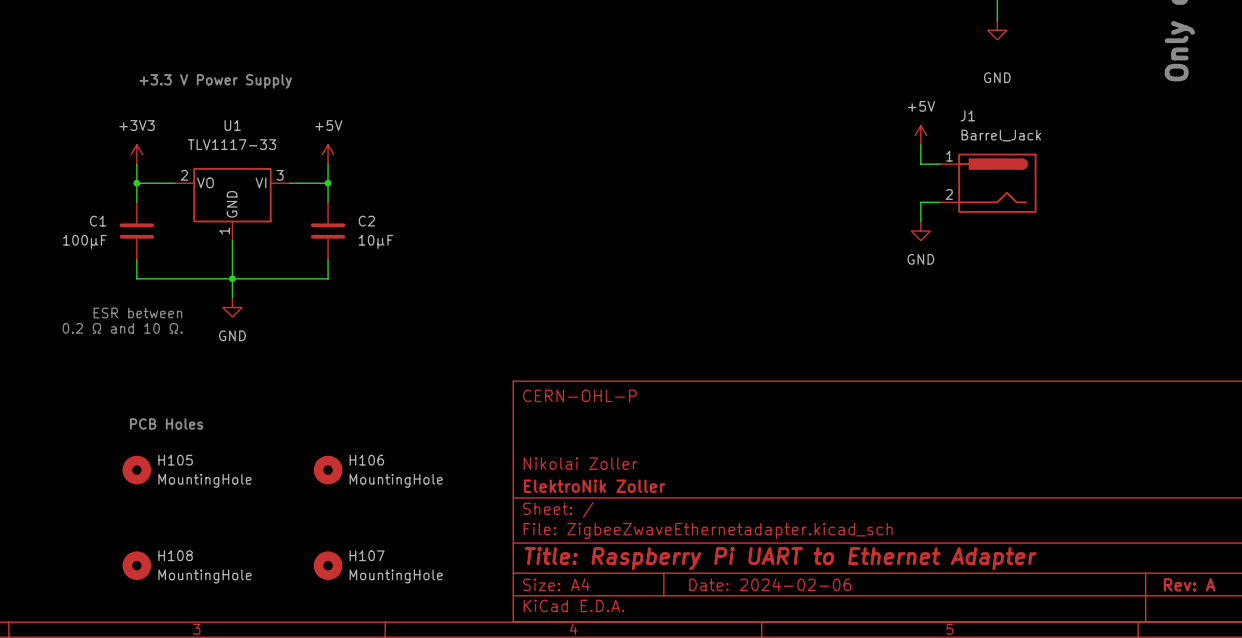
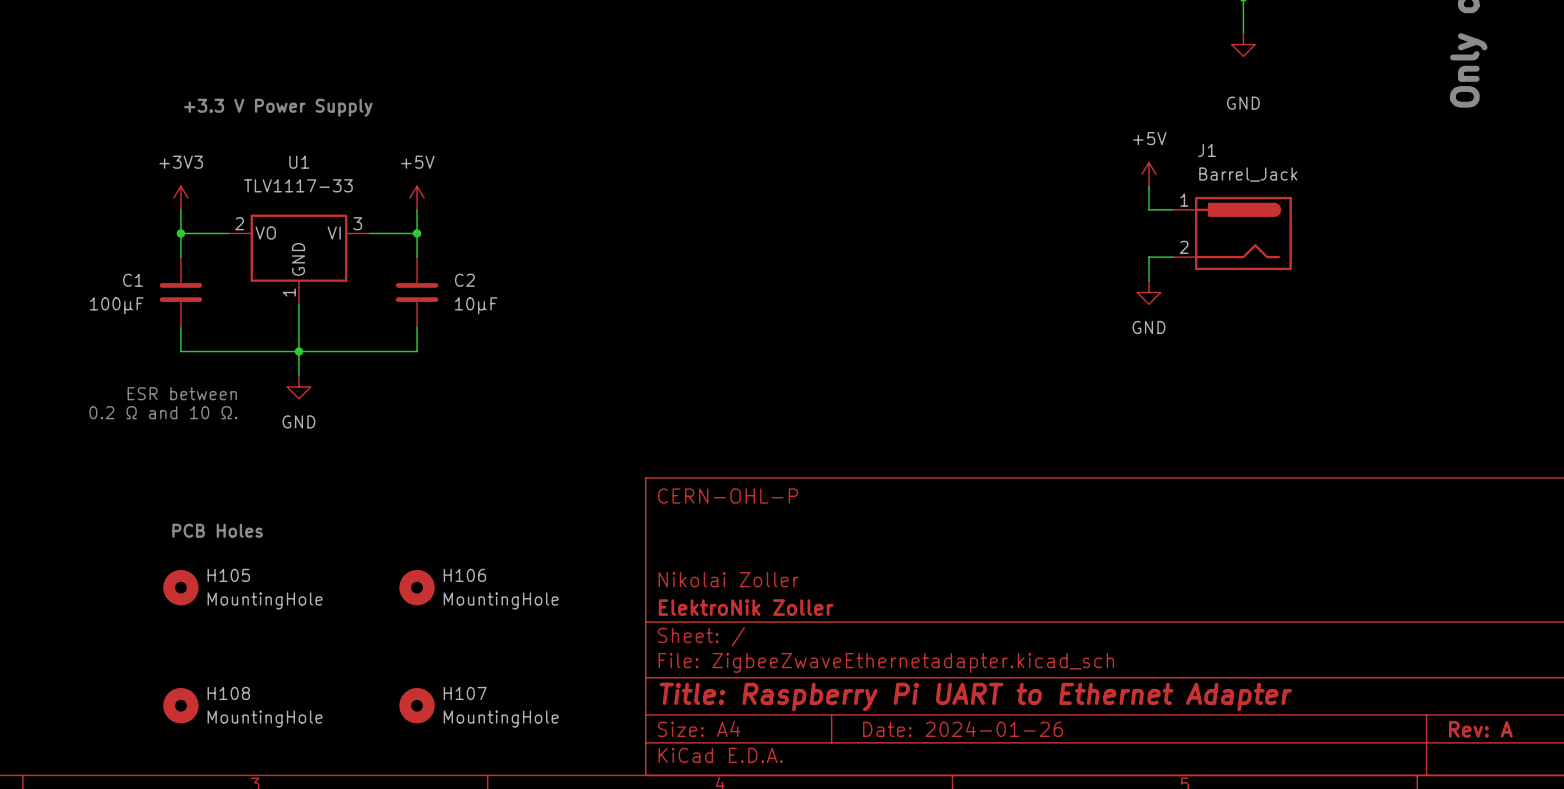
title block: Date: 2024-02-06 (770, 584) -> Date: 2024-01-26 (963, 729)

